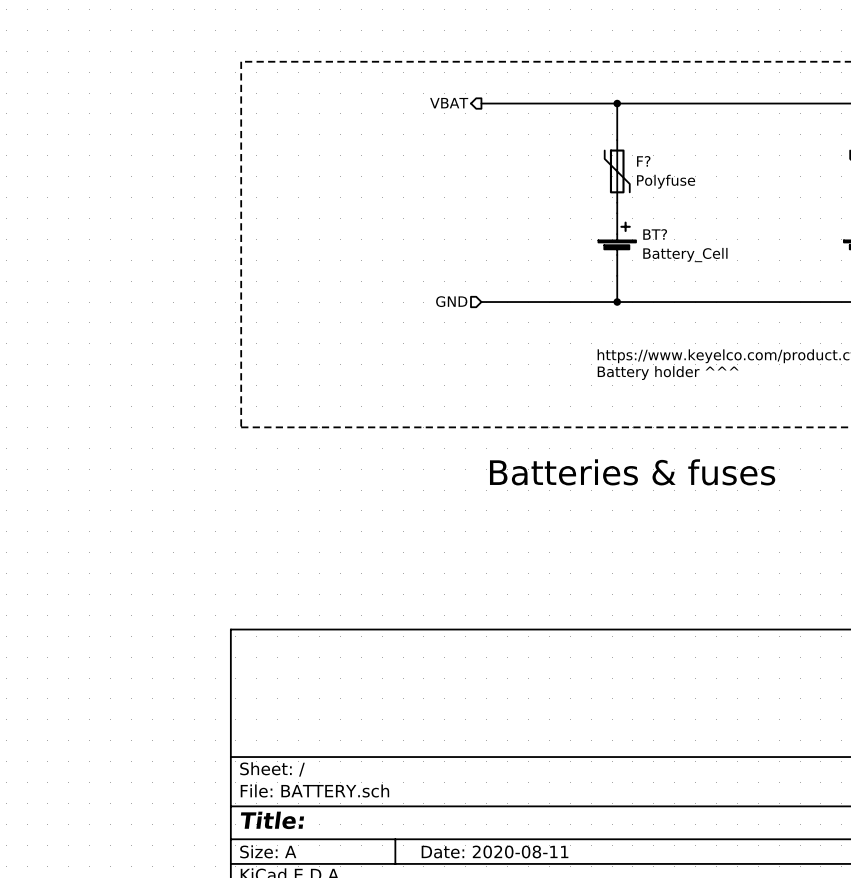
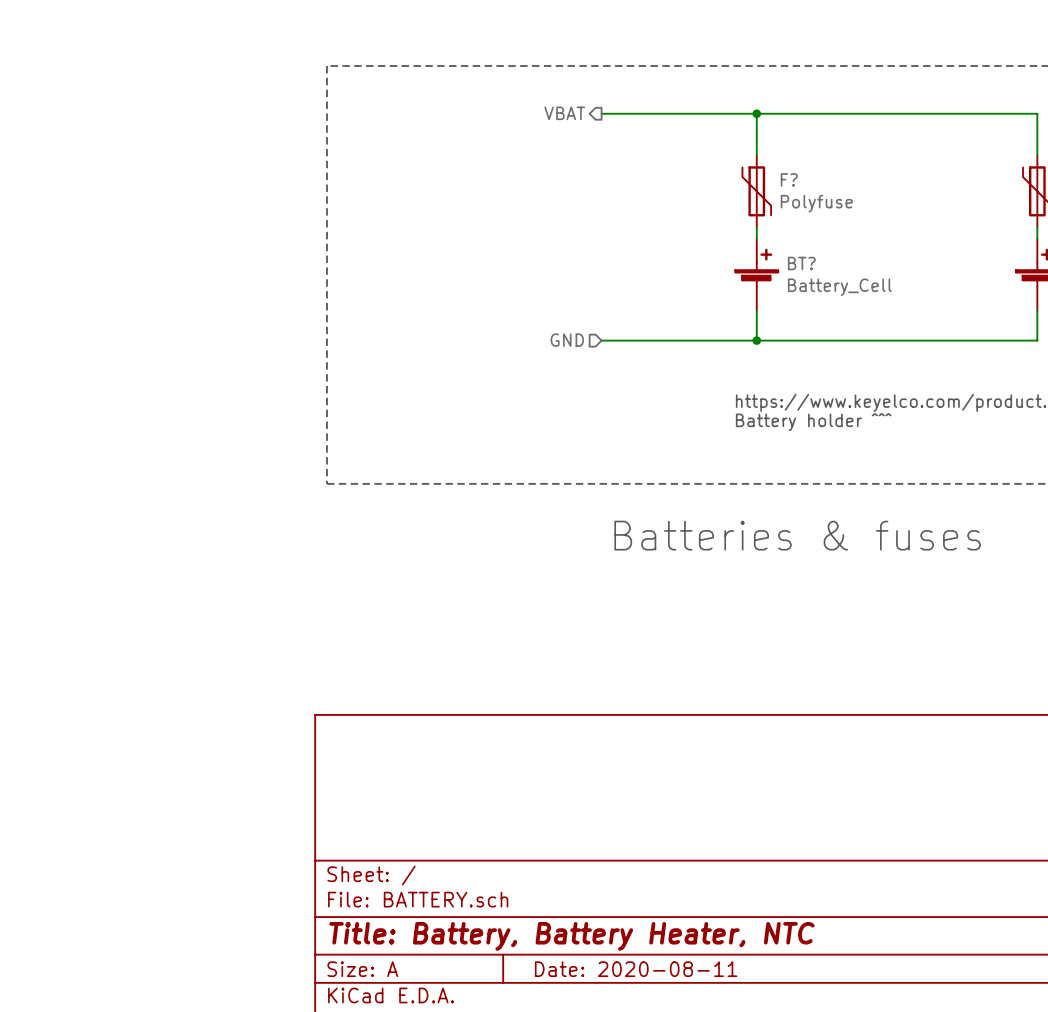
title block: Title: (272, 820) -> Title: Battery, Battery Heater, NTC (571, 936)

